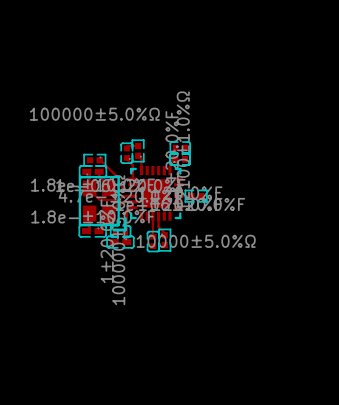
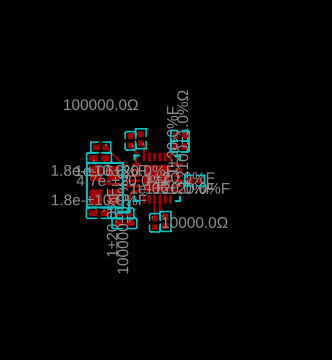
part value: 100000±5.0%Ω (94, 114) -> 100000.0Ω (100, 104)
part value: 10000±5.0%Ω (196, 241) -> 10000.0Ω (194, 222)

